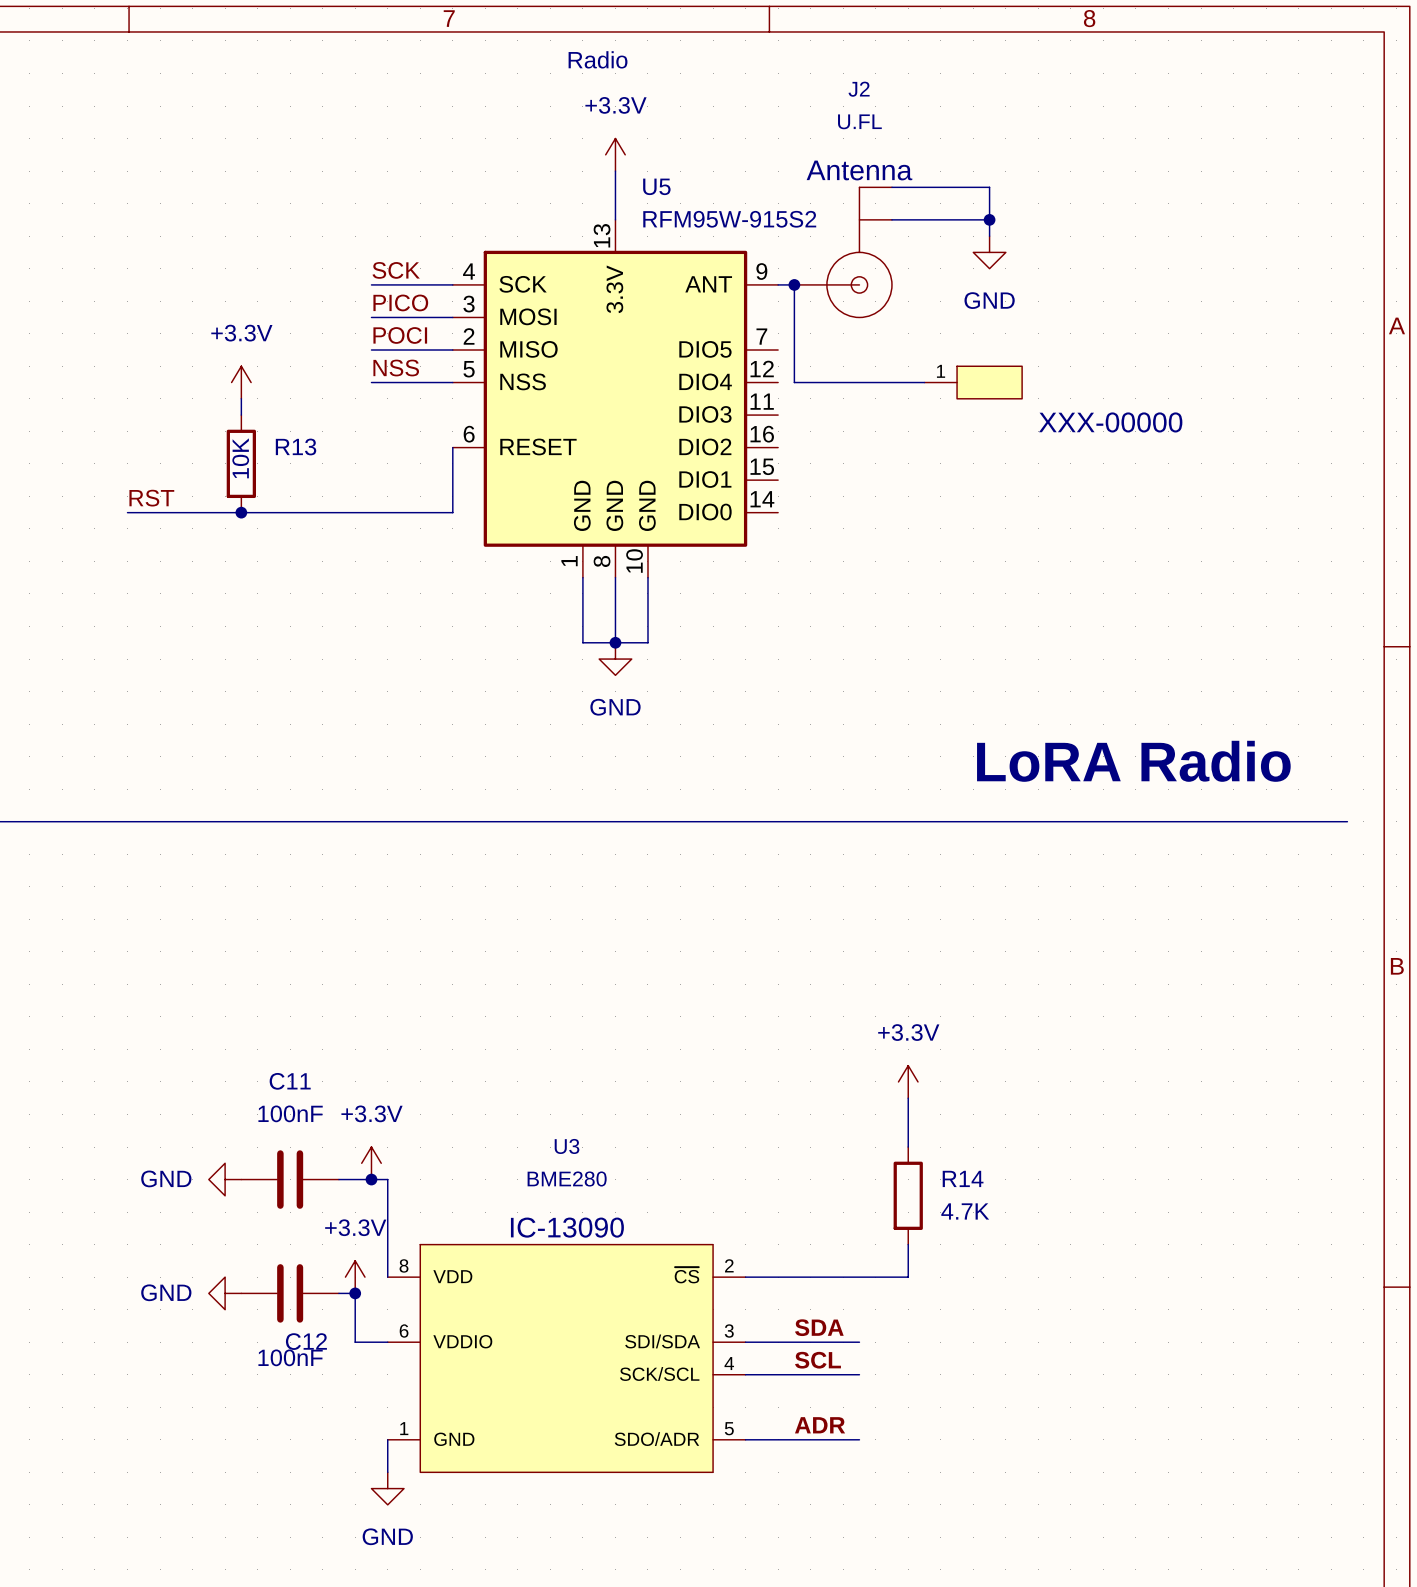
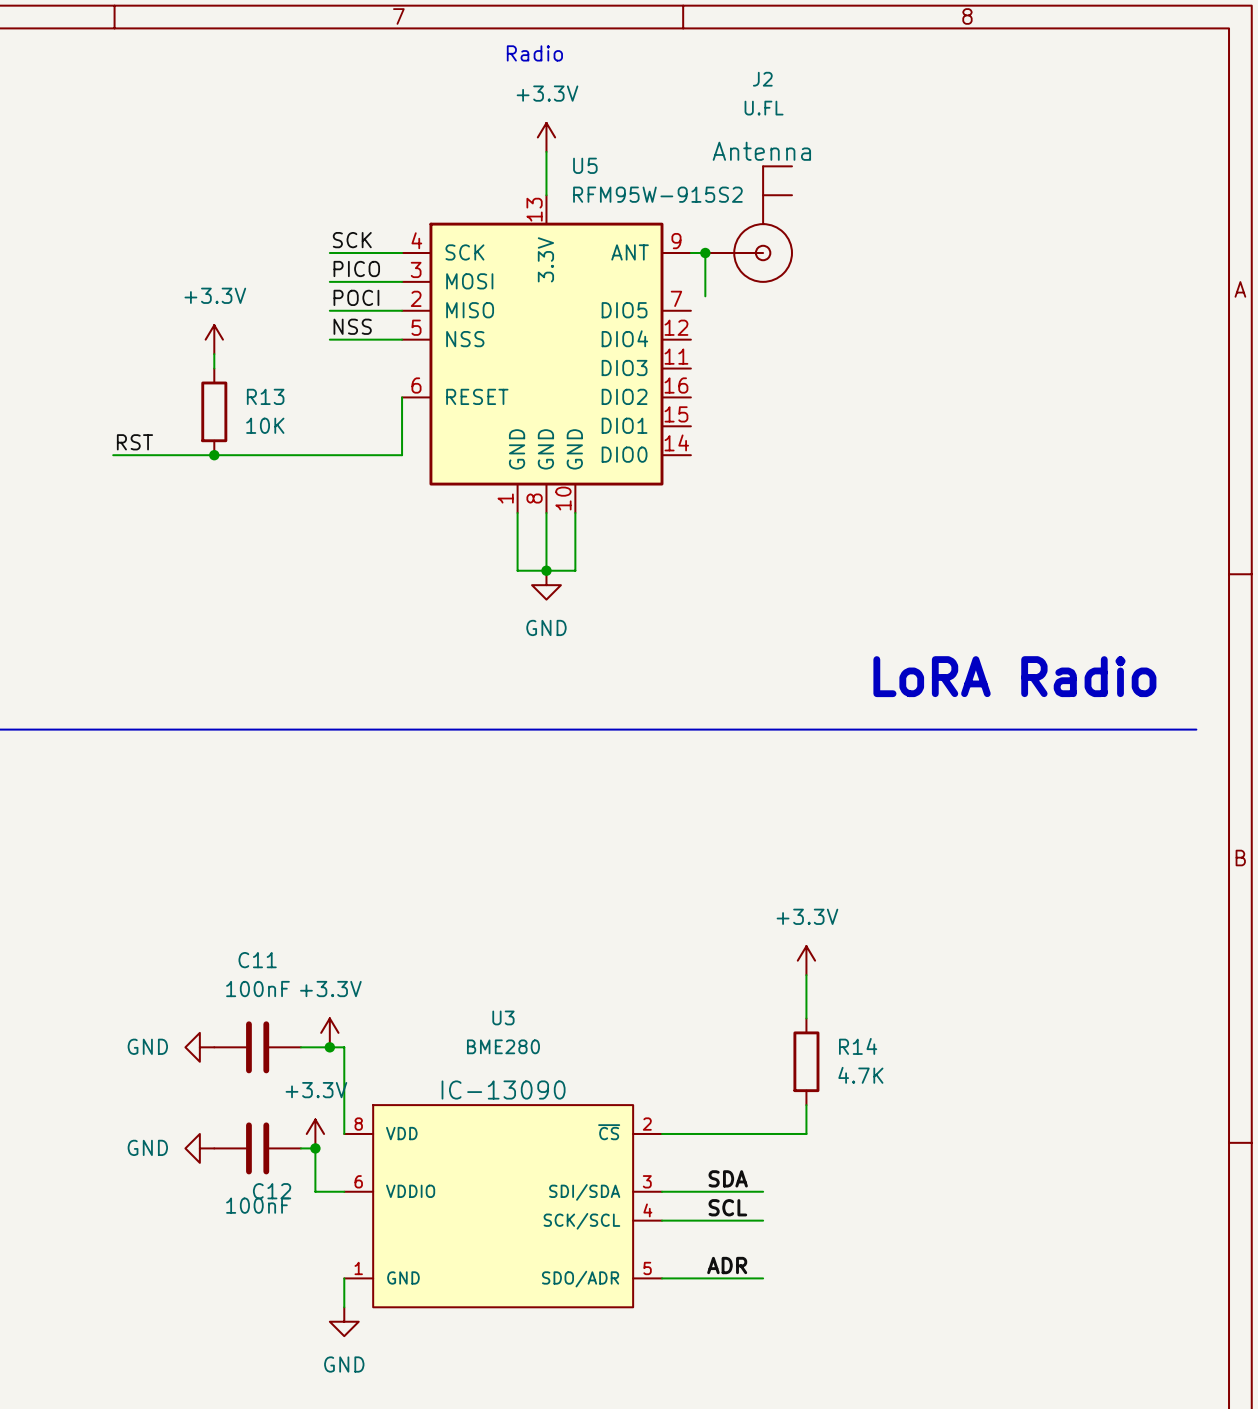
wire: (891, 187) (989, 187) (989, 236) -> none
wire: (891, 219) (989, 219) -> none
junction: (989, 219) -> none
power symbol: GND (989, 252) -> none
wire: (794, 333) (794, 382) (924, 382) -> none
part: (973, 382) -> none
R13 value rotation: 0° (240, 458) -> 90° clockwise (265, 425)
R13 value position: 10K (240, 458) -> 10K (265, 425)

